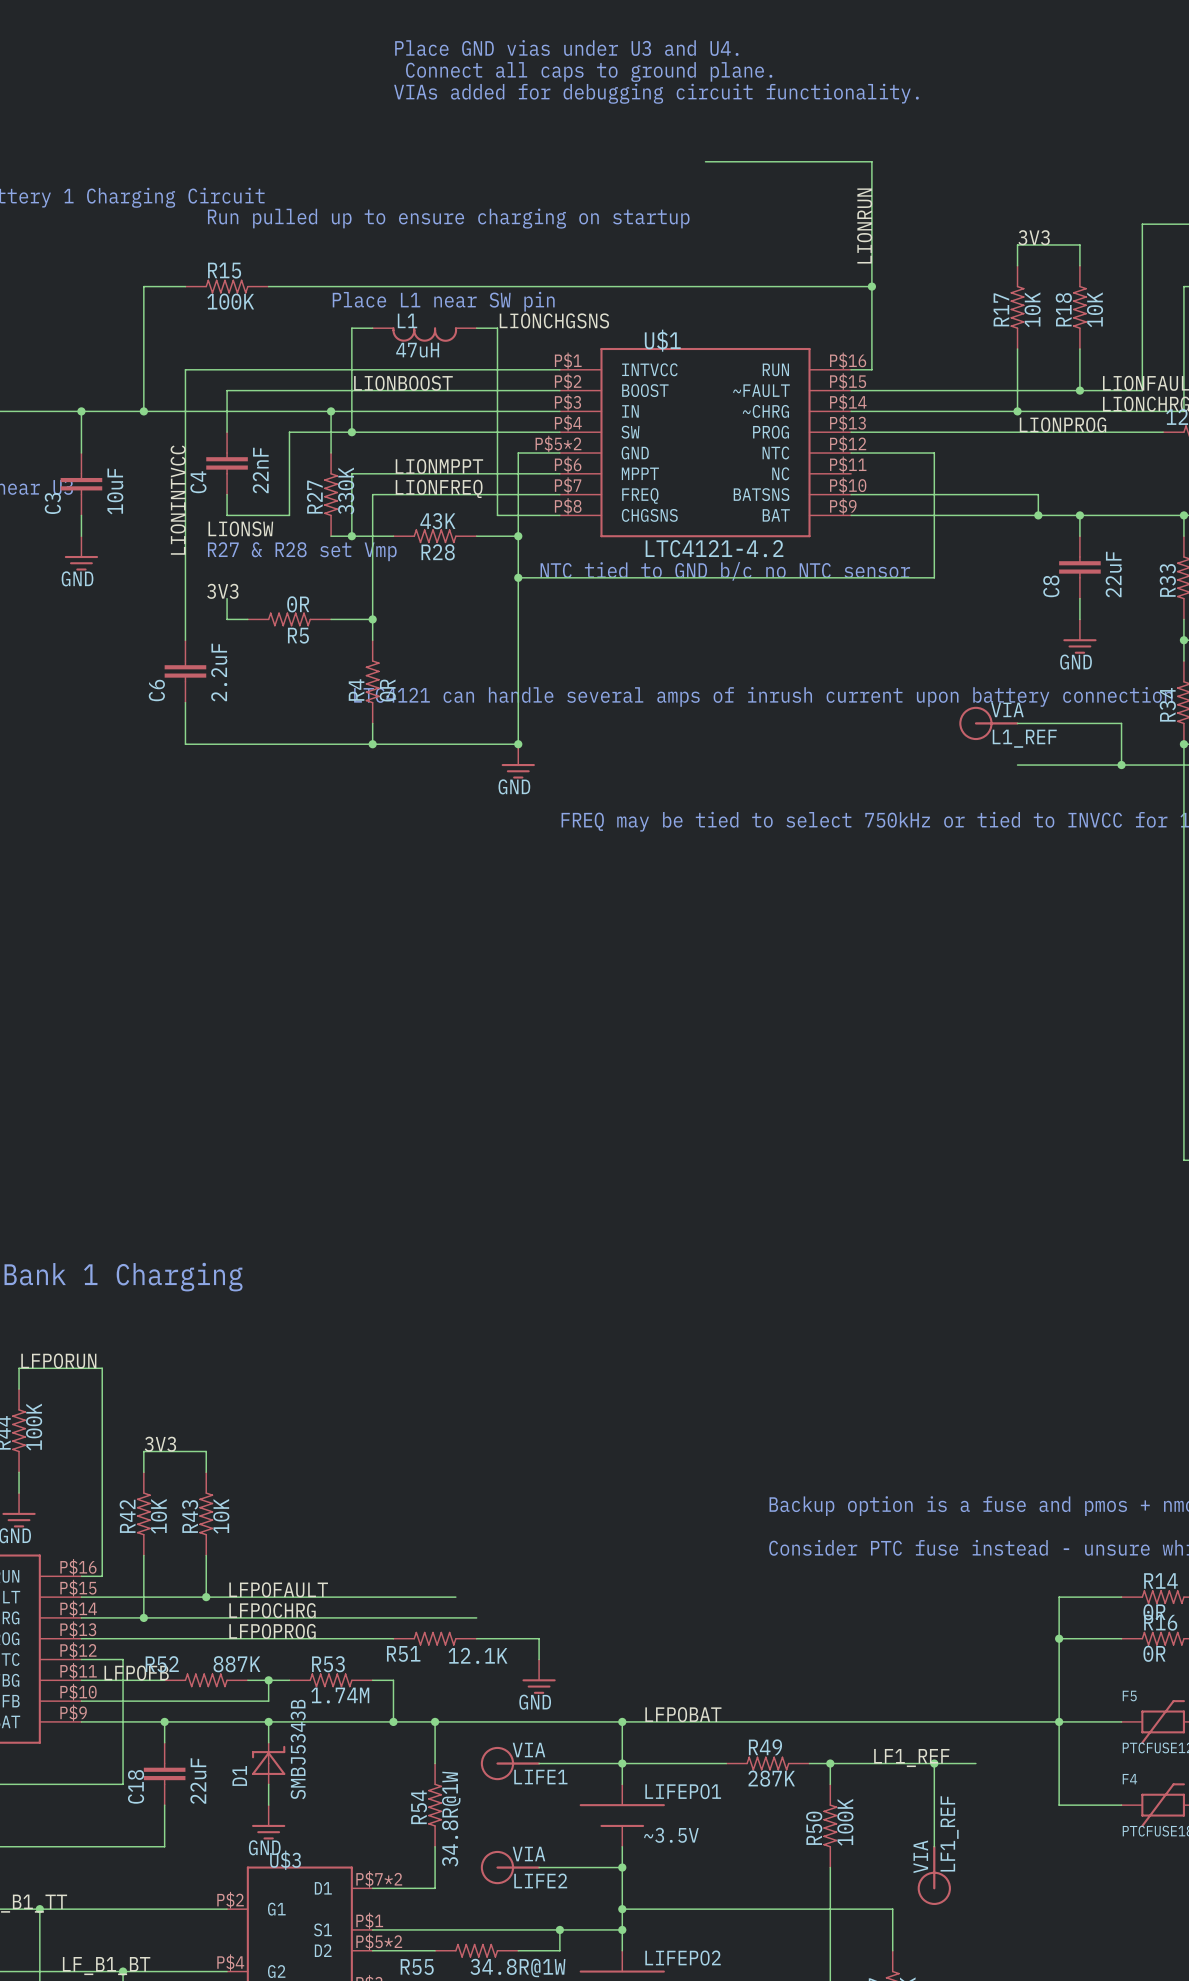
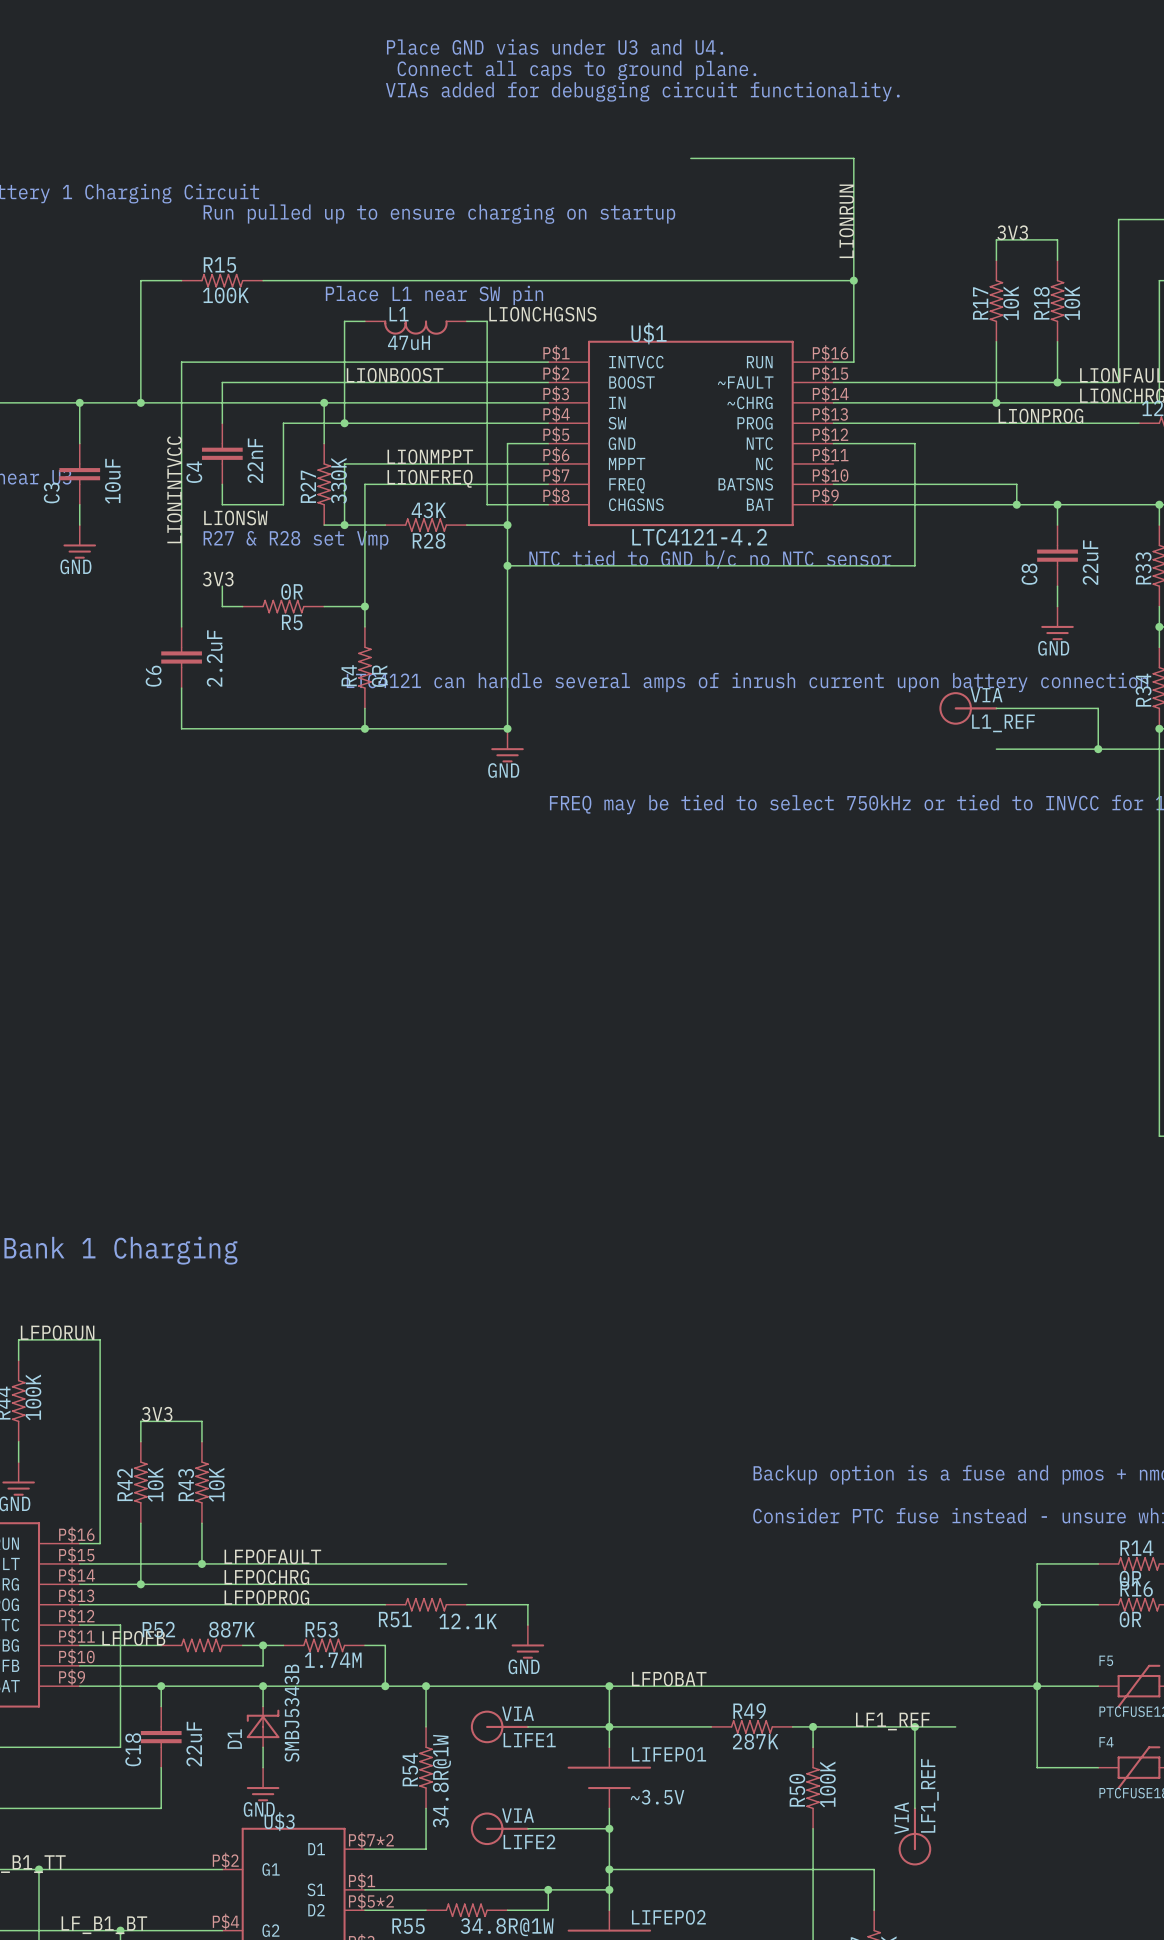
U$1 pin number: P$5*2 (558, 444) -> P$5 (556, 434)

